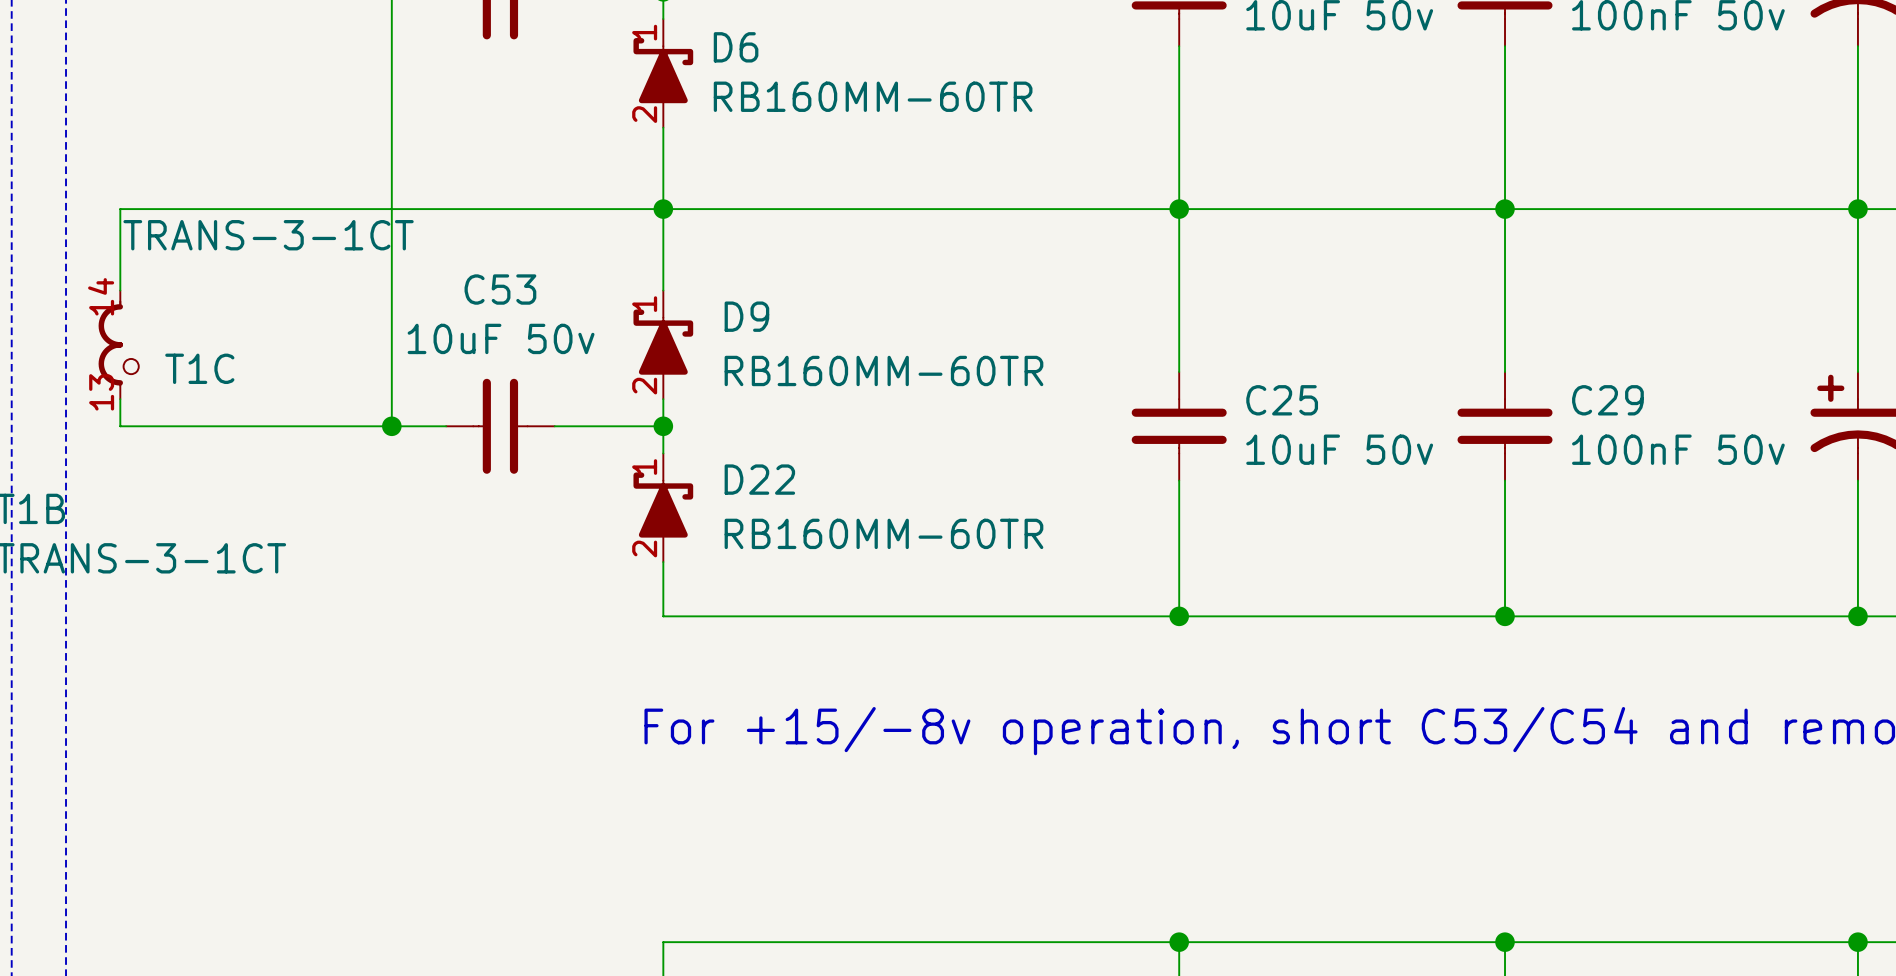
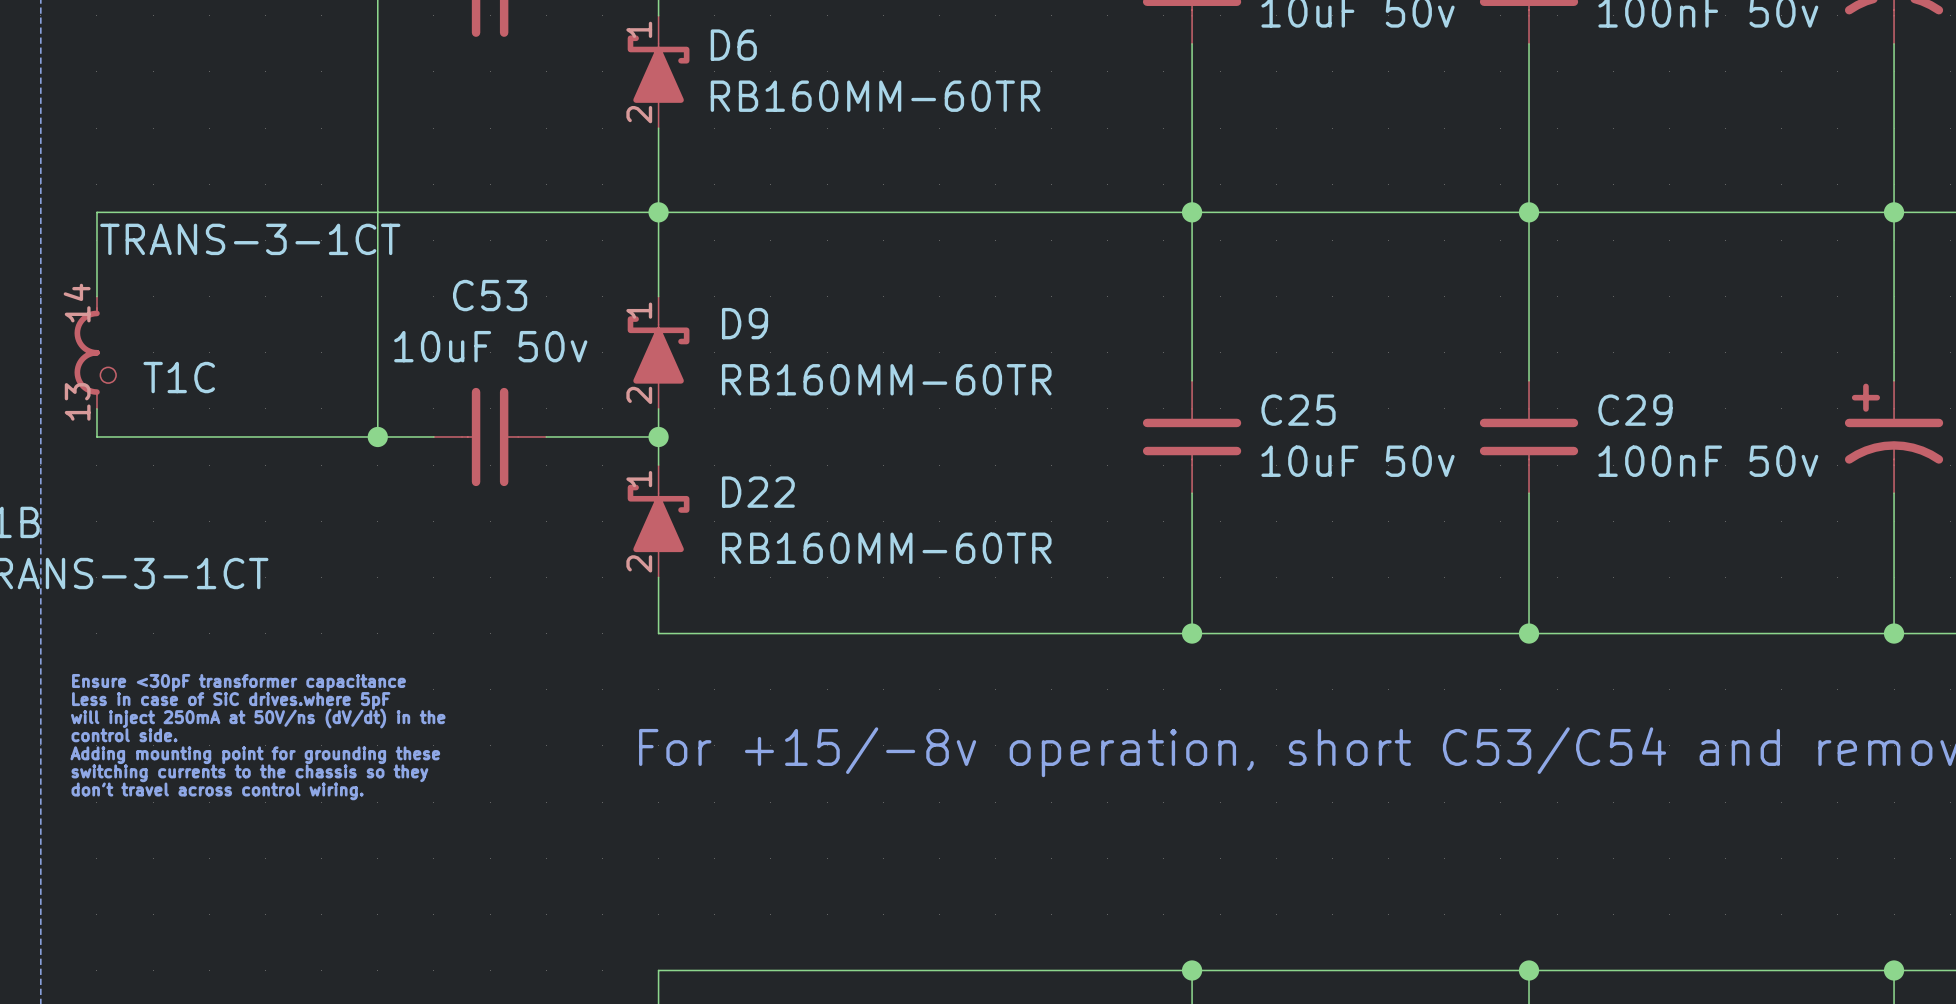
text: none -> Ensure <30pF transformer capacitance (238, 682)
text: none -> Less in case of SiC drives.where 5pF (231, 700)
text: none -> will inject 250mA at 50V/ns (dV/dt) in the (258, 718)
text: none -> control side. (124, 735)
text: none -> Adding mounting point for grounding these (255, 755)
text: none -> switching currents to the chassis so they (249, 773)
text: none -> don't travel across control wiring. (217, 791)

